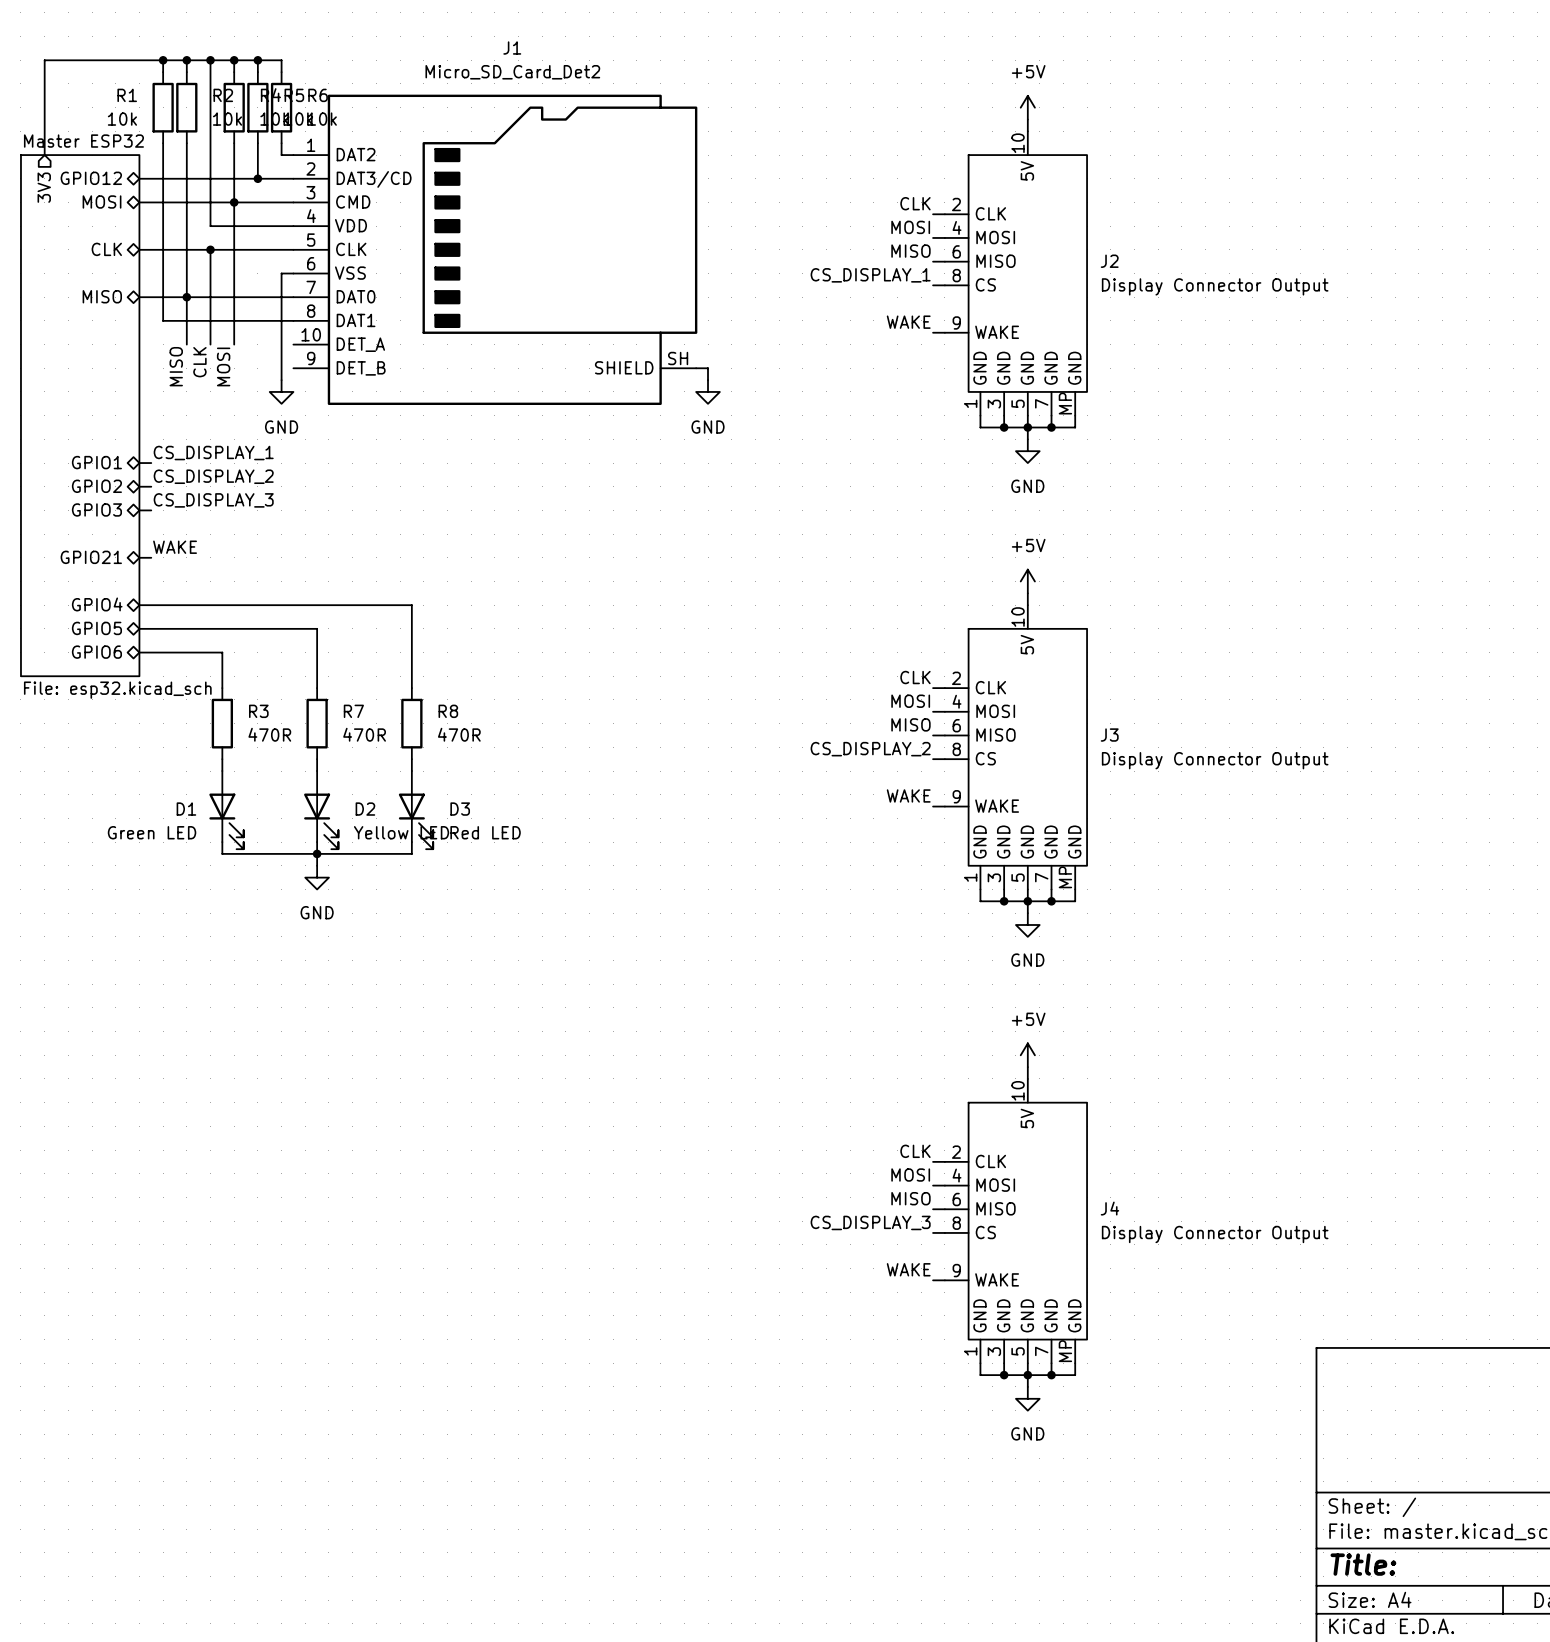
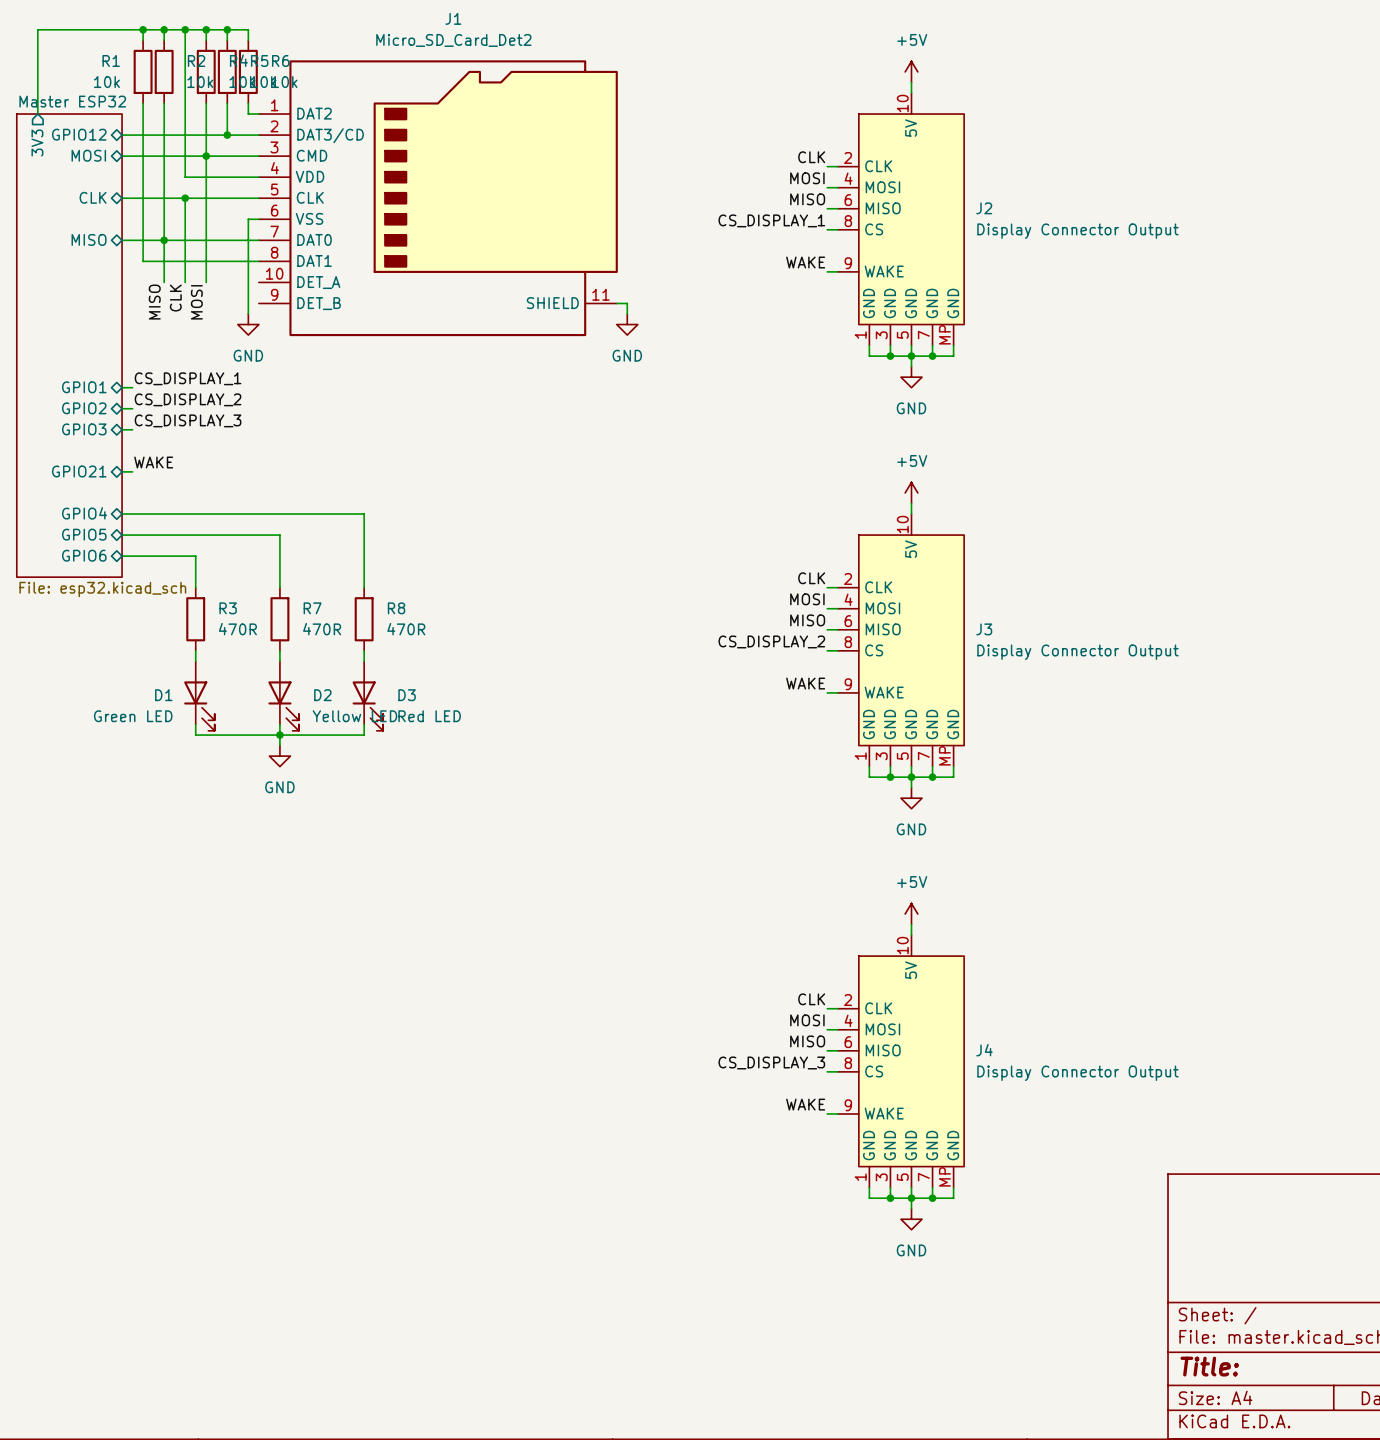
J1 pin number: SH (678, 358) -> 11 (600, 294)

